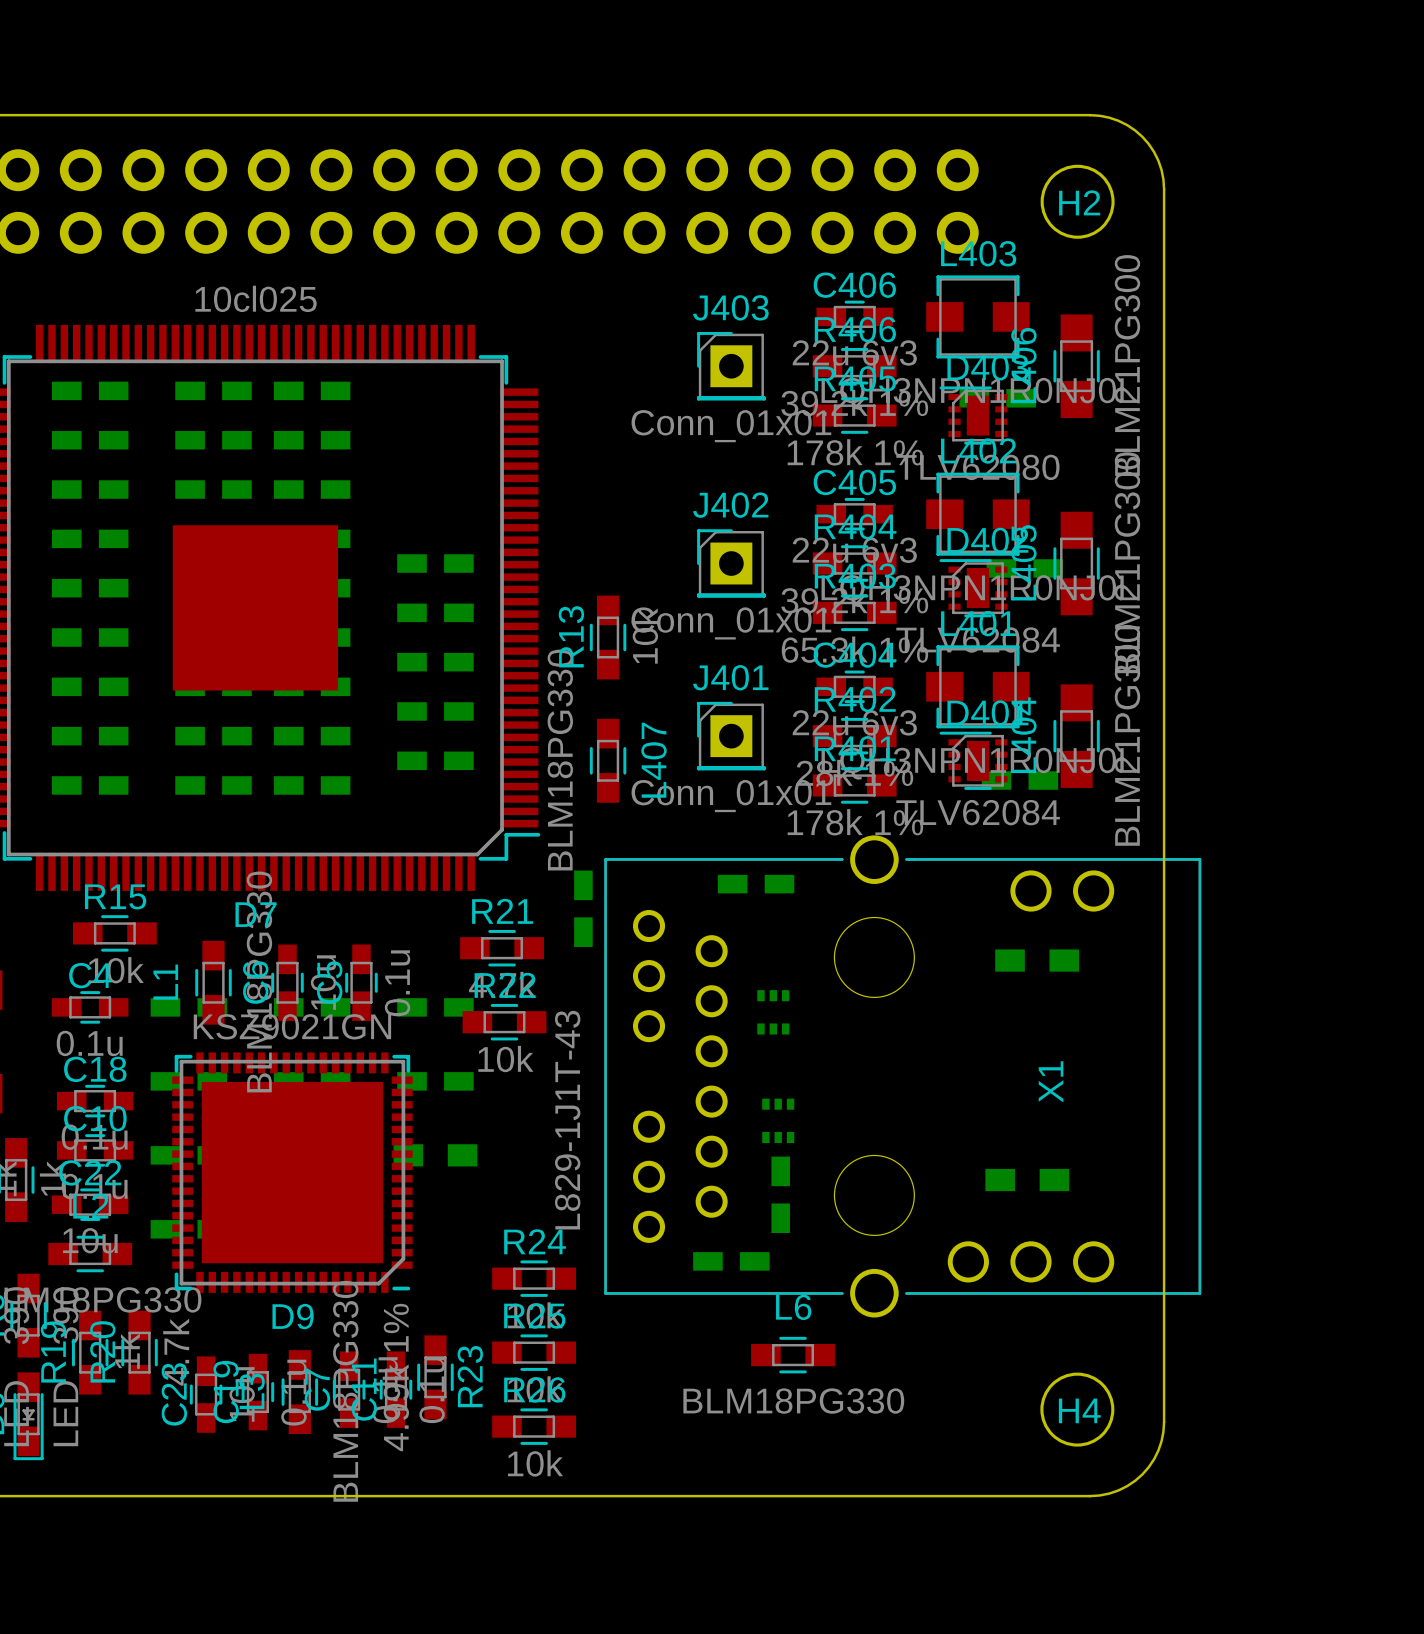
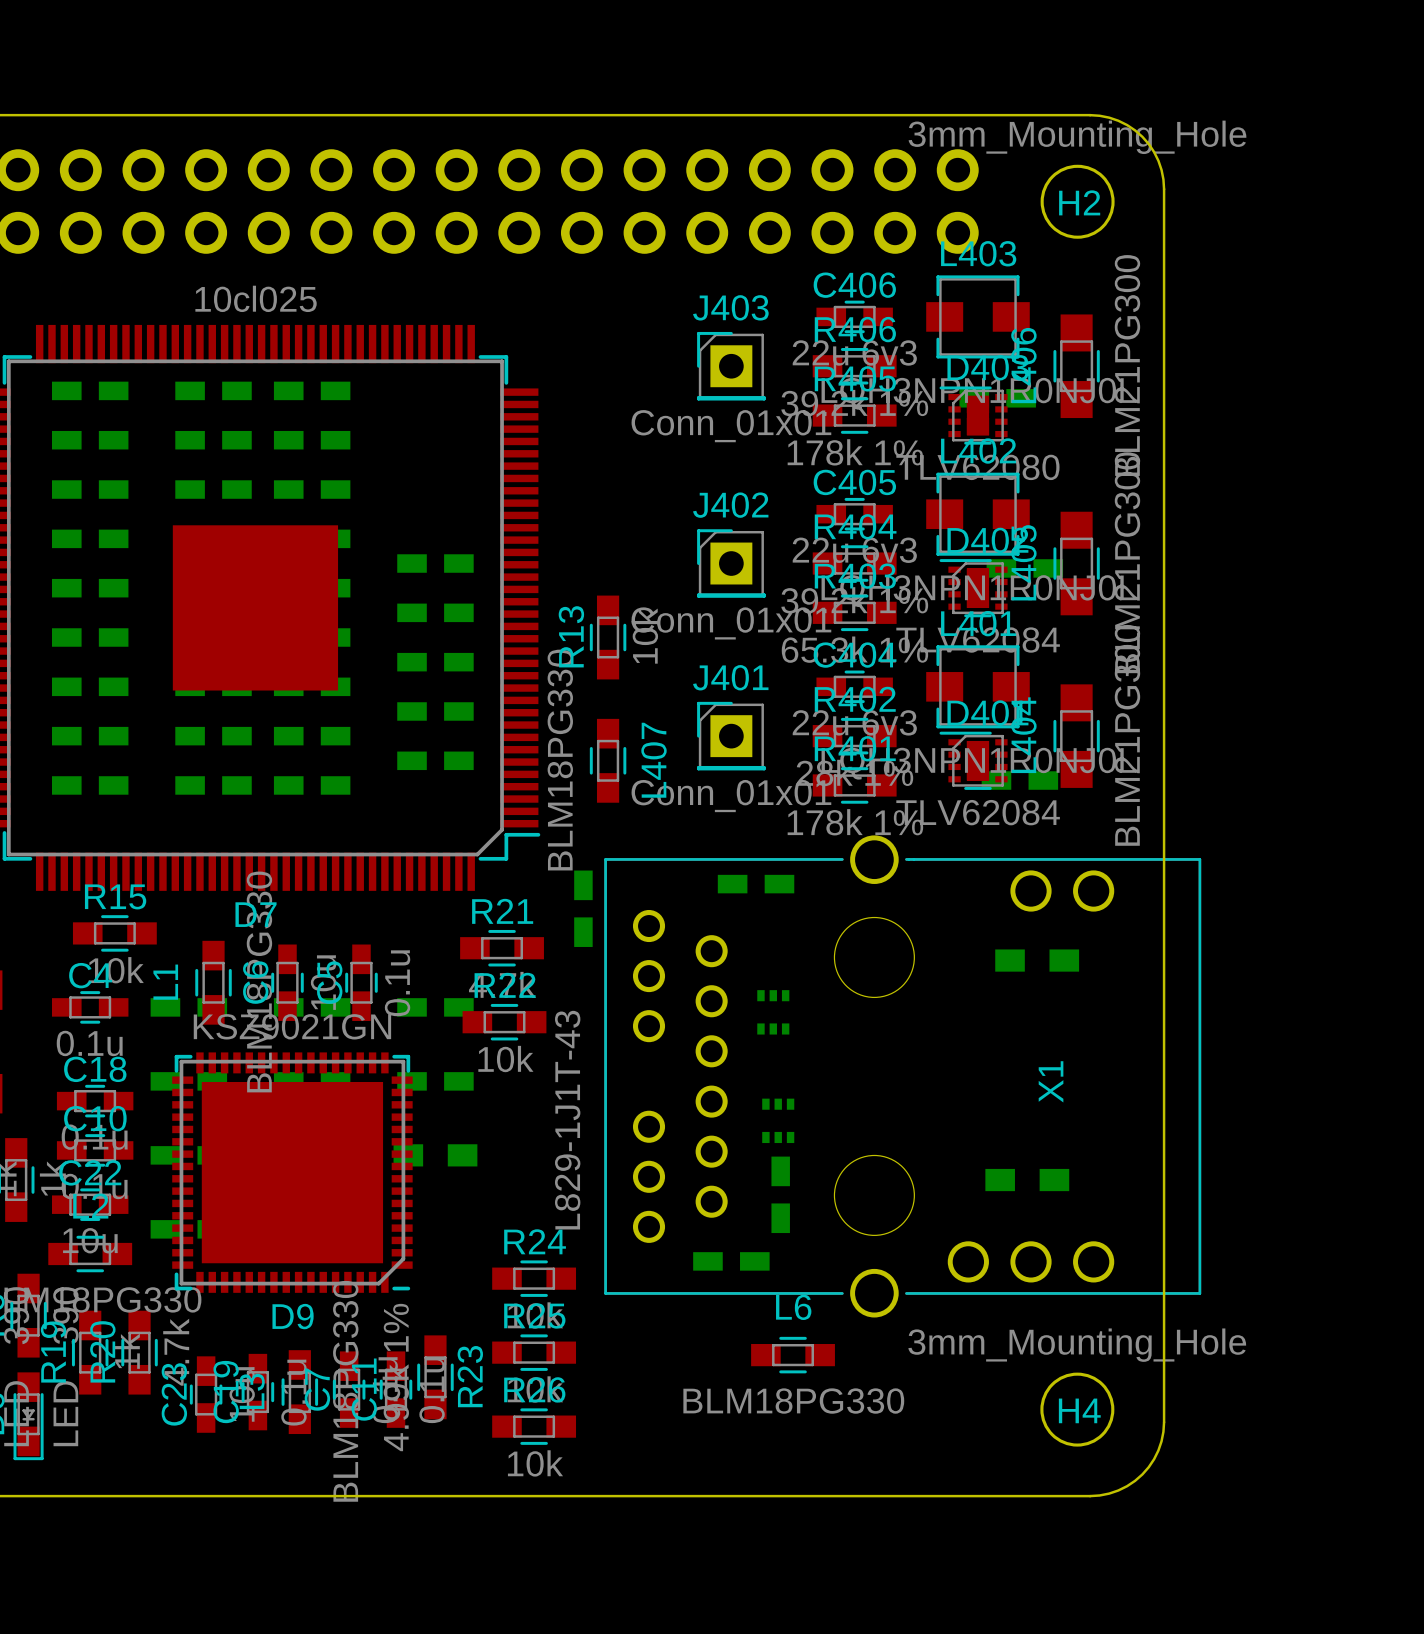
H2 value: none -> 3mm_Mounting_Hole (1077, 137)
H4 value: none -> 3mm_Mounting_Hole (1077, 1345)

